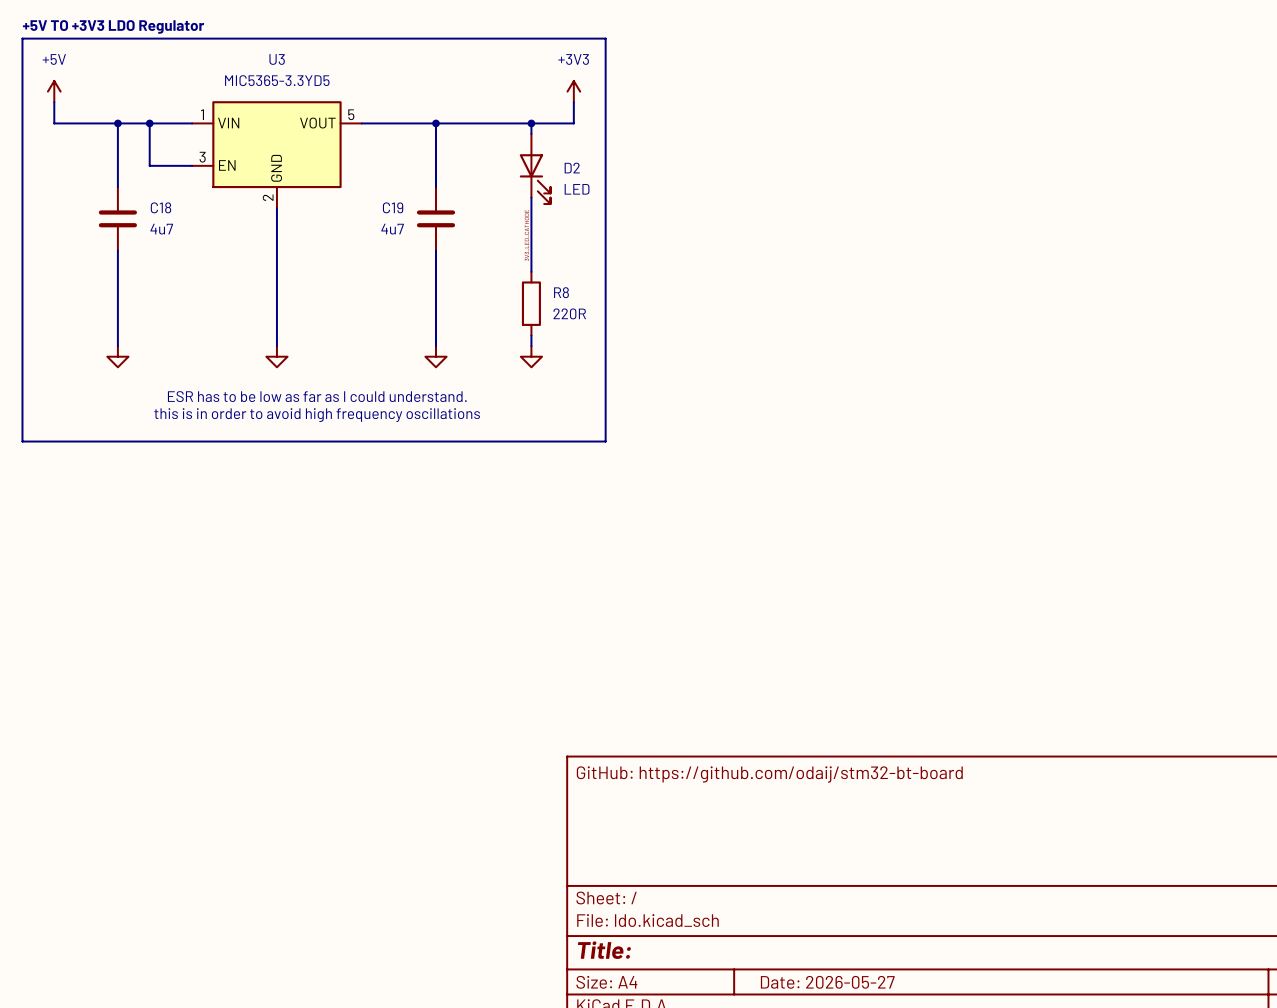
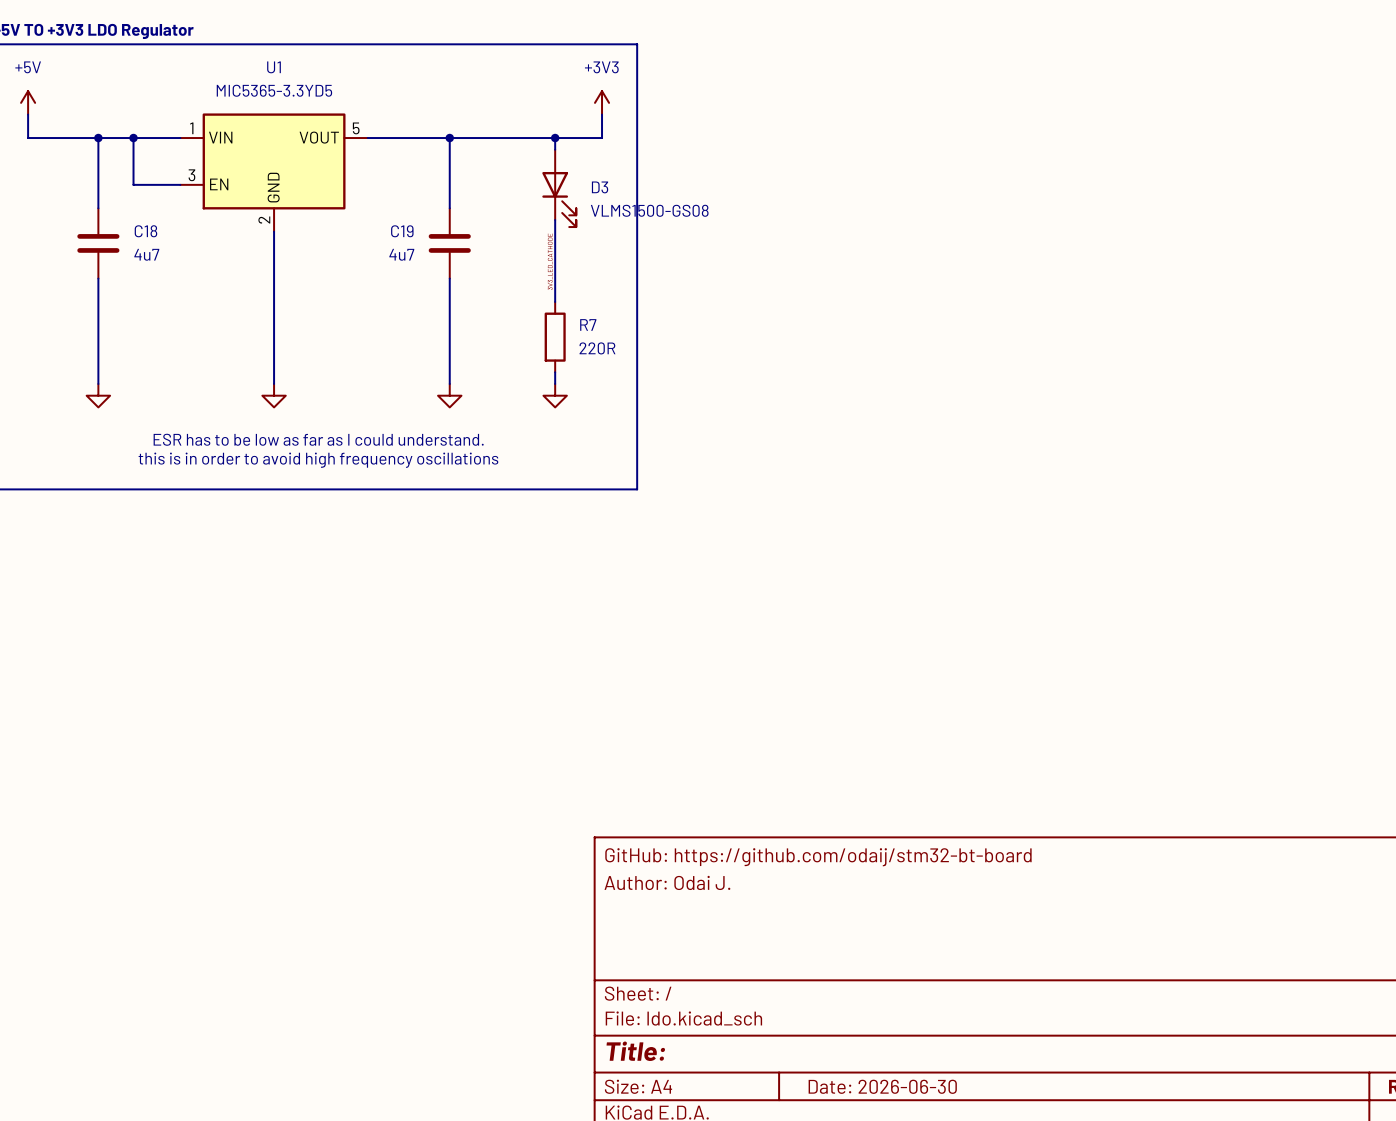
U3 name: U3 (277, 59) -> U1 (274, 67)
D2 name: D2 (572, 168) -> D3 (600, 187)
D2 value: LED (577, 189) -> VLMS1500-GS08 (649, 210)
R8 name: R8 (561, 292) -> R7 (588, 324)
title block: none -> Author: Odai J. (667, 882)
title block: Date: 2026-05-27 (827, 982) -> Date: 2026-06-30 (882, 1086)

